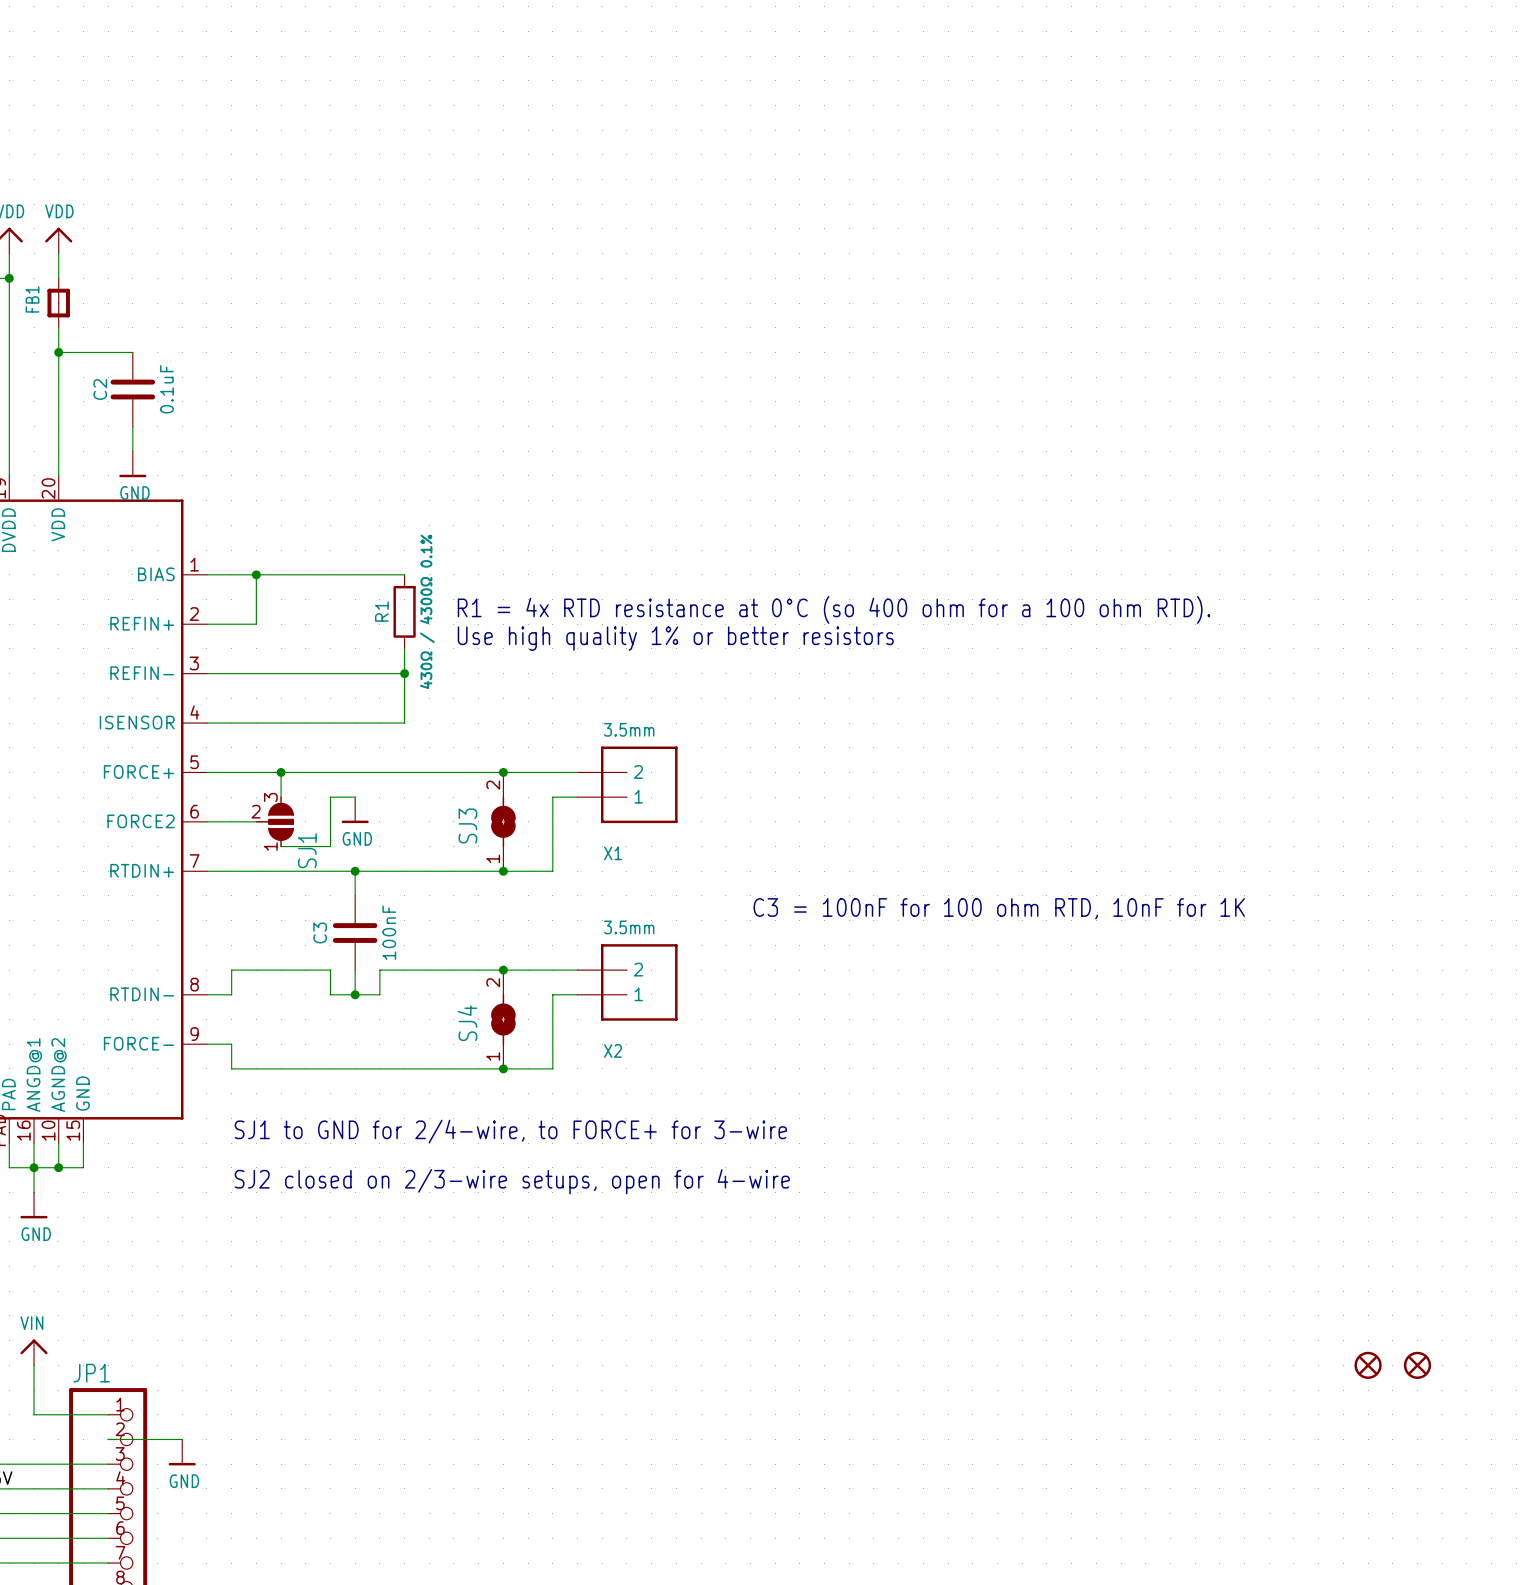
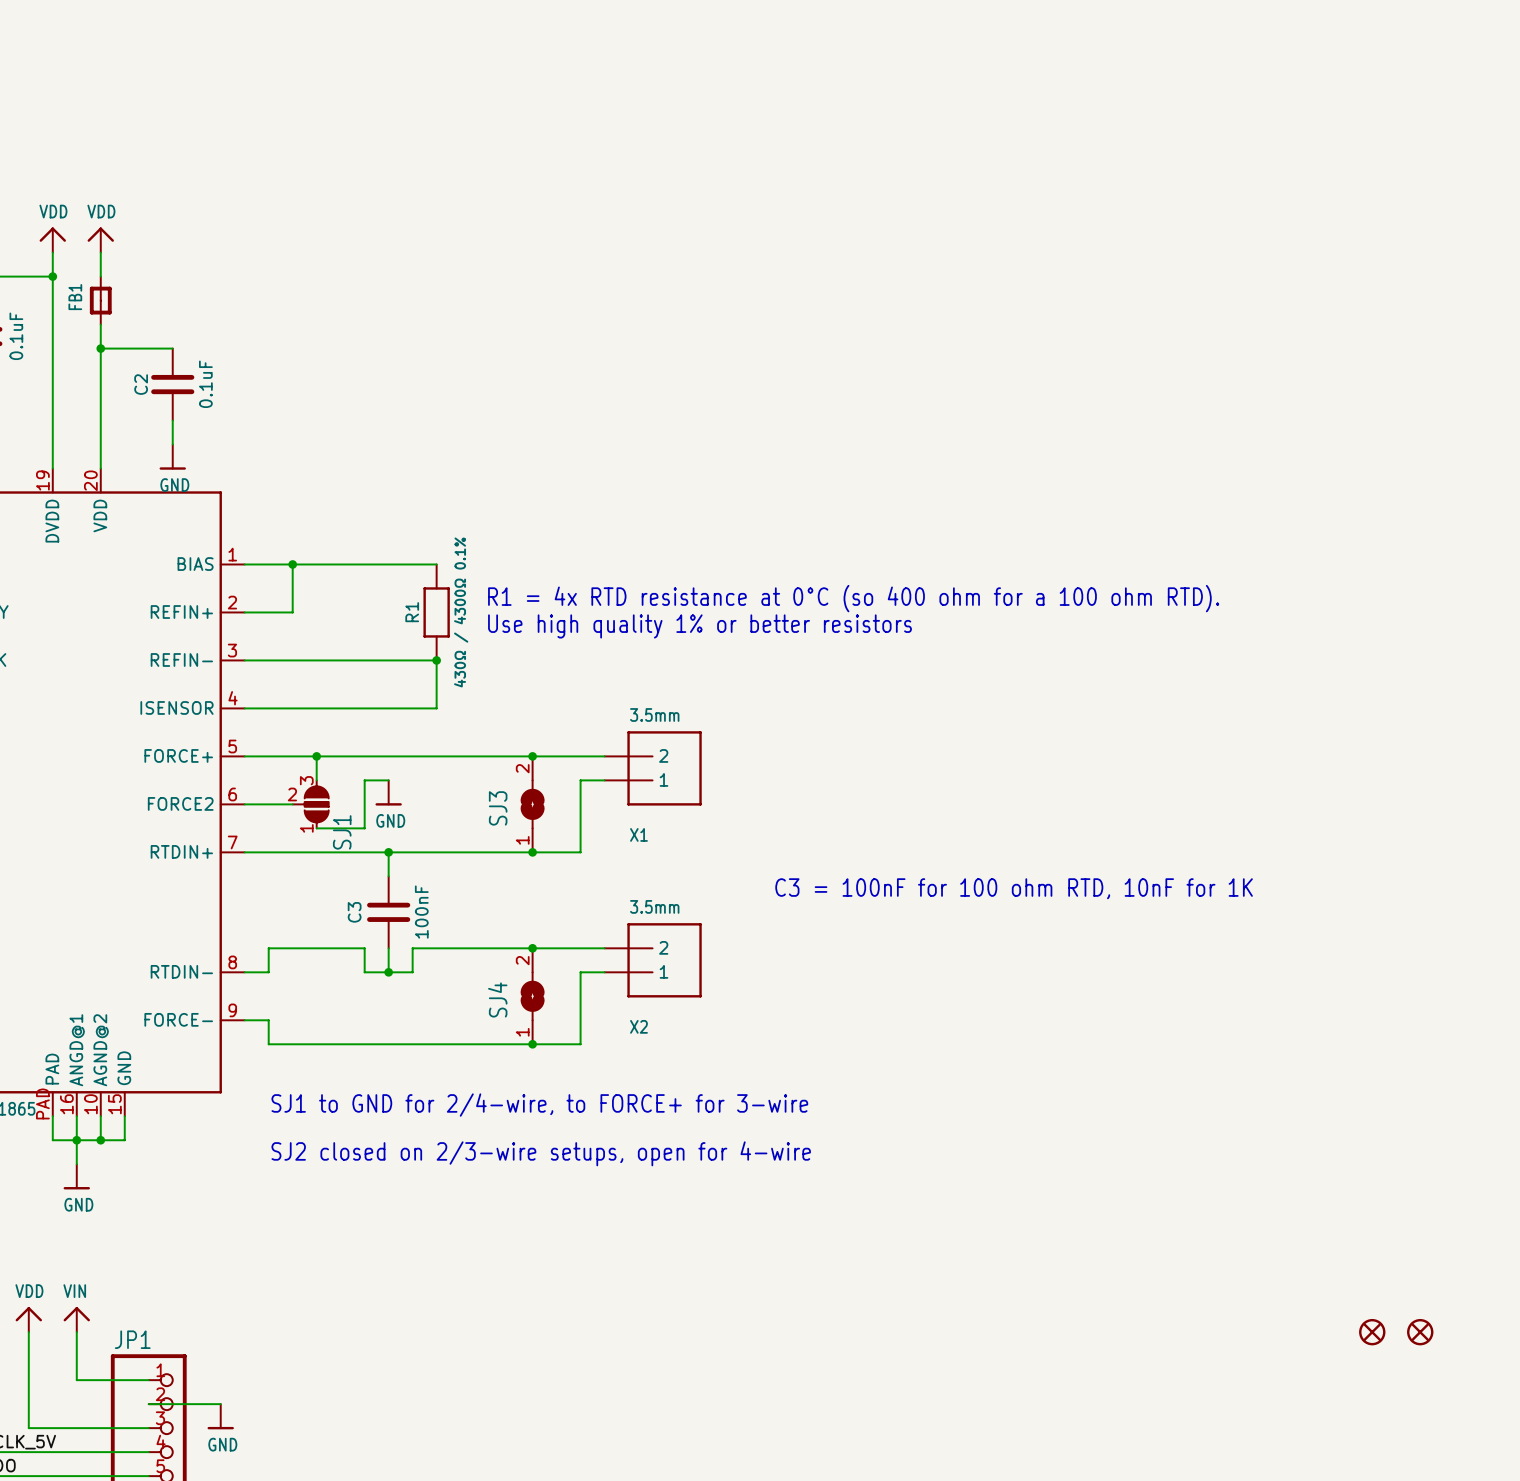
R1 symbol: [393, 574, 416, 649] -> [423, 564, 450, 661]

